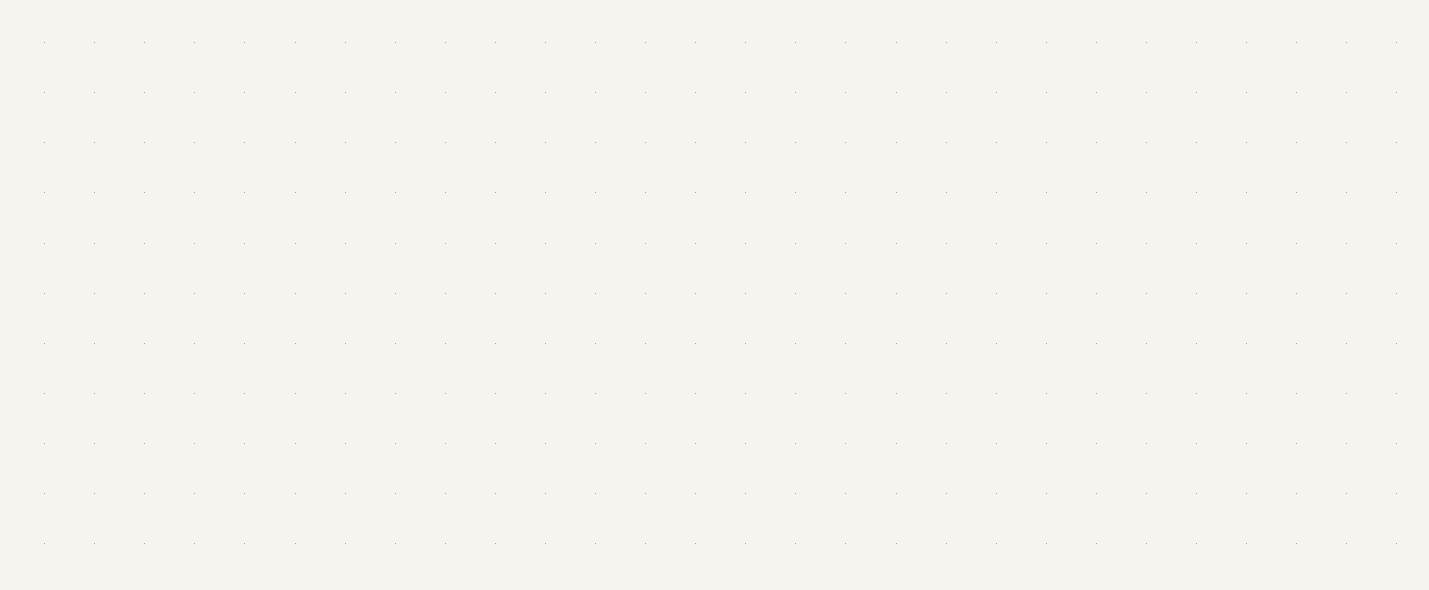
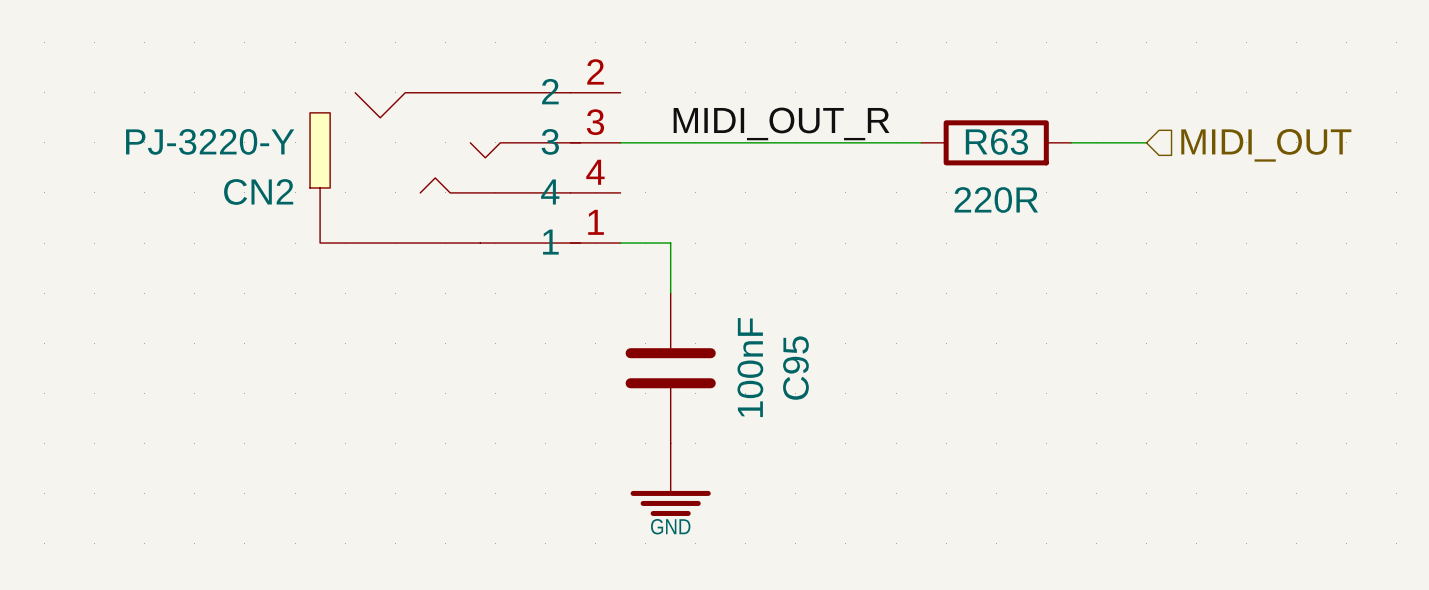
label: none -> MIDI_OUT_R (781, 123)
wire: none -> (620, 142) (921, 142)
R63: none -> 220R (996, 142)
wire: none -> (1071, 142) (1146, 142)
hierarchical label: none -> MIDI_OUT (1266, 145)
CN2: none -> PJ-3220-Y (465, 167)
wire: none -> (620, 243) (670, 243) (670, 293)
C95: none -> 100nF (670, 368)
power symbol: none -> GND (670, 479)

